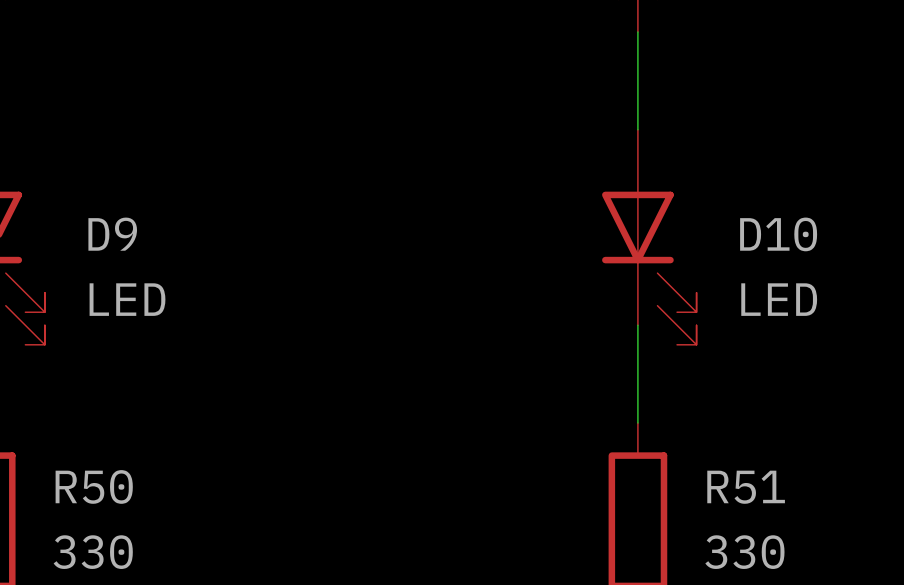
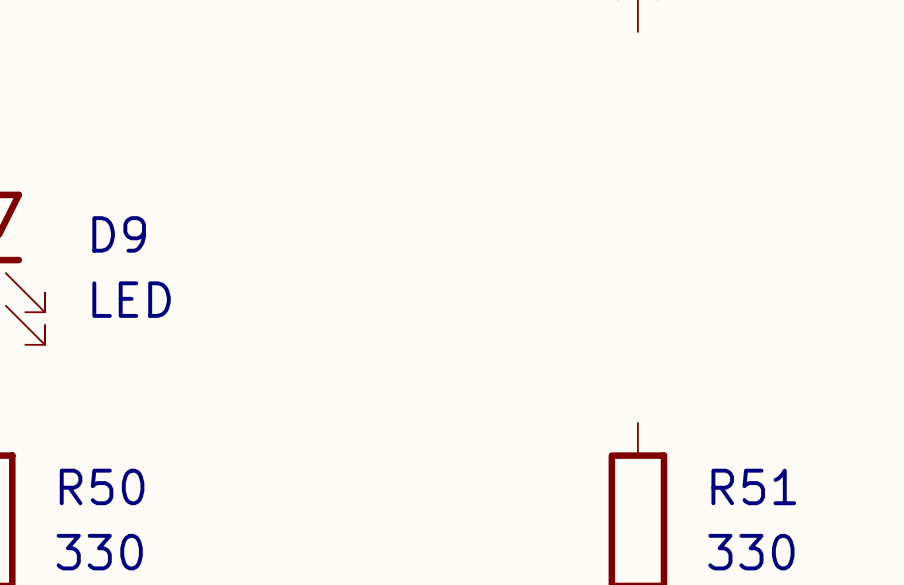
wire: (637, 31) (637, 129) -> none
D10: LED (649, 237) -> none
wire: (637, 325) (637, 423) -> none

